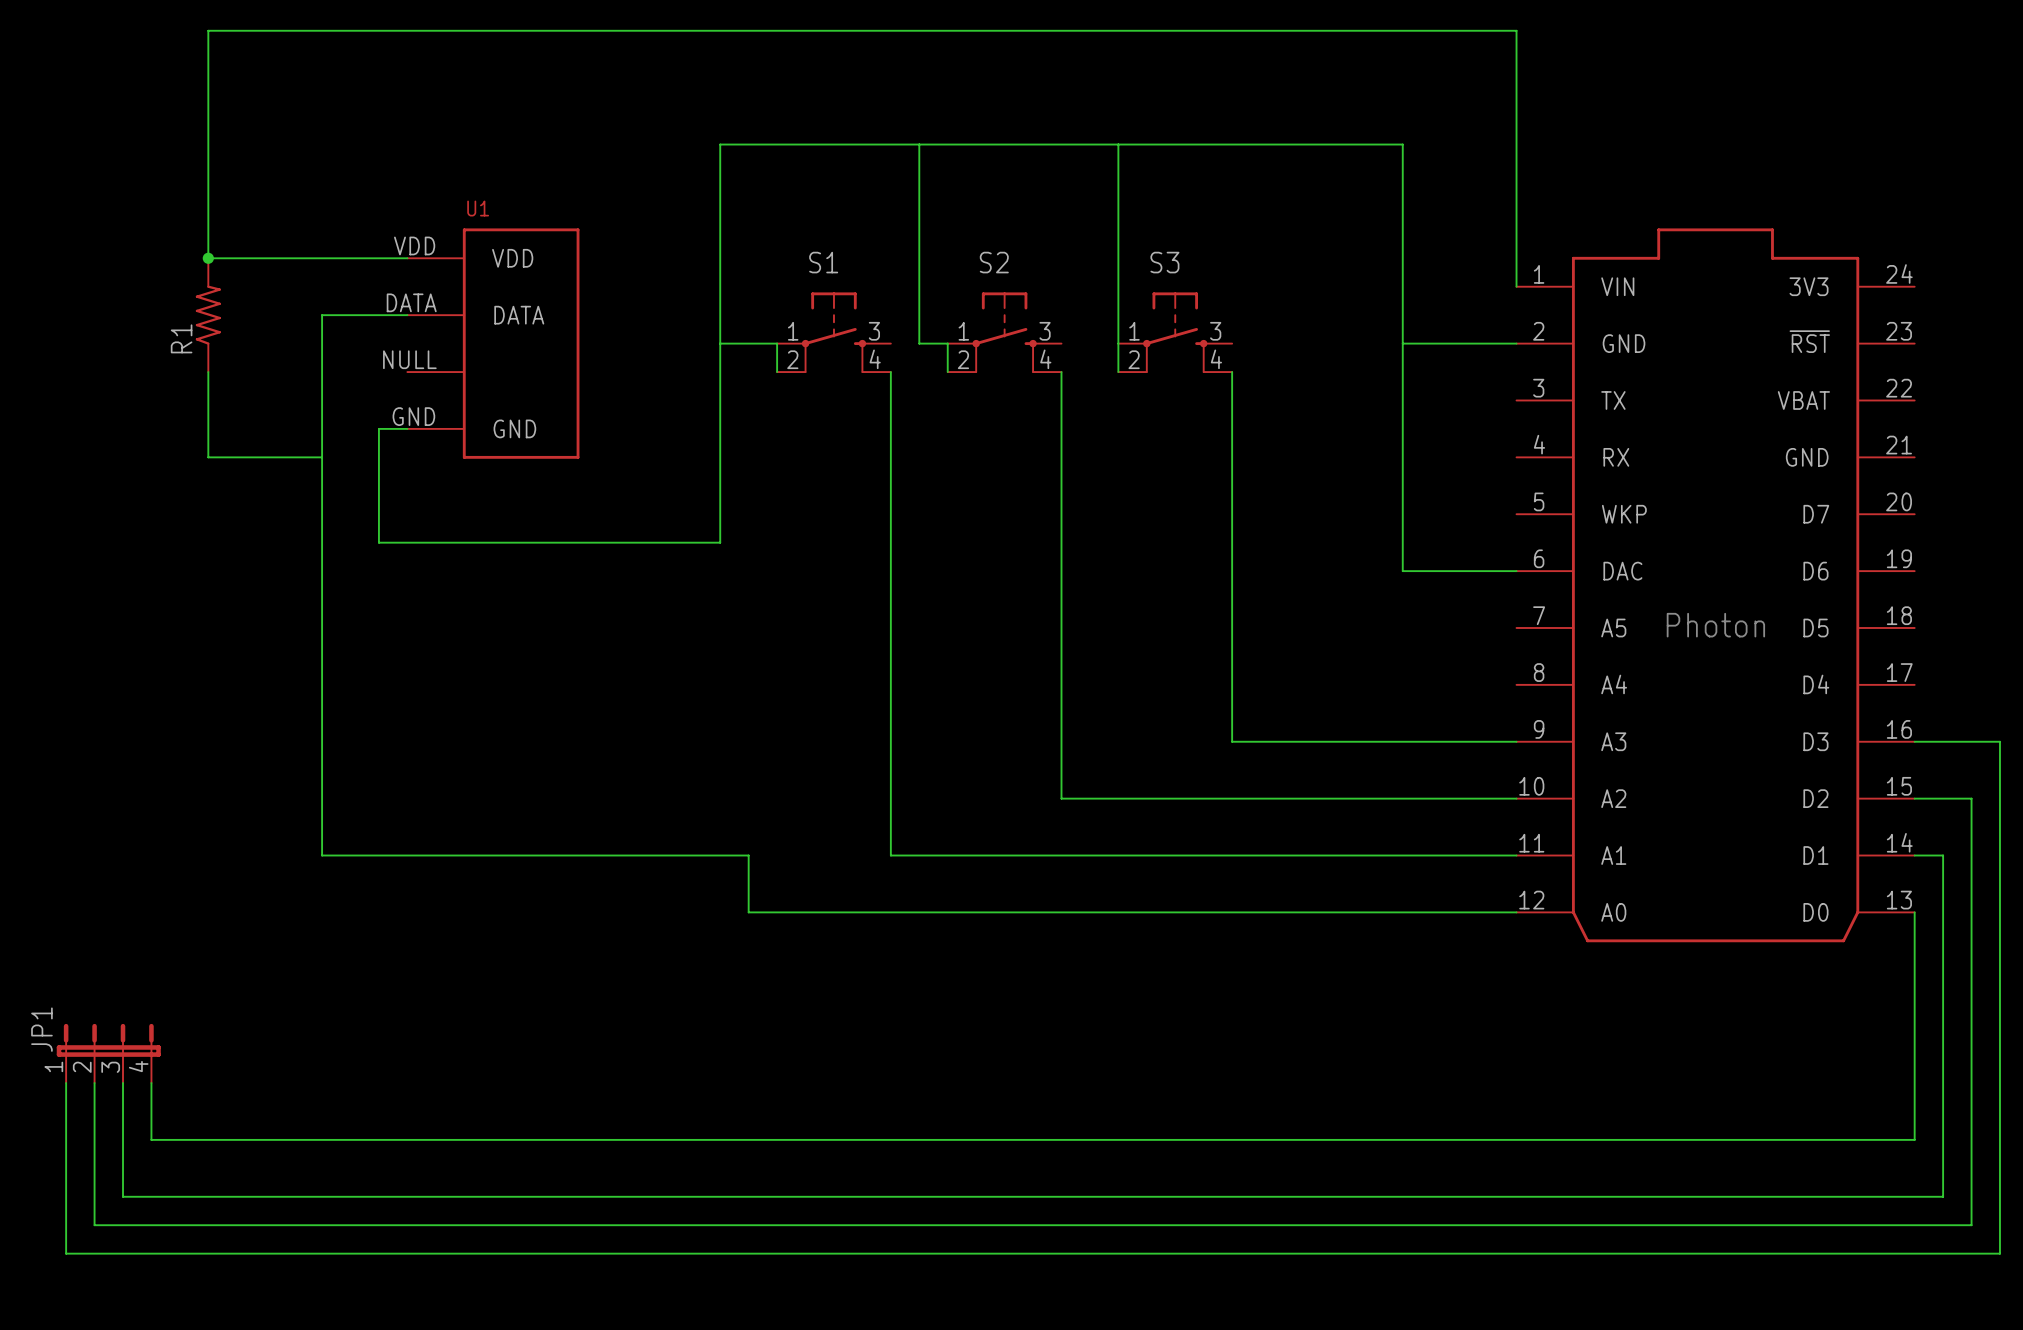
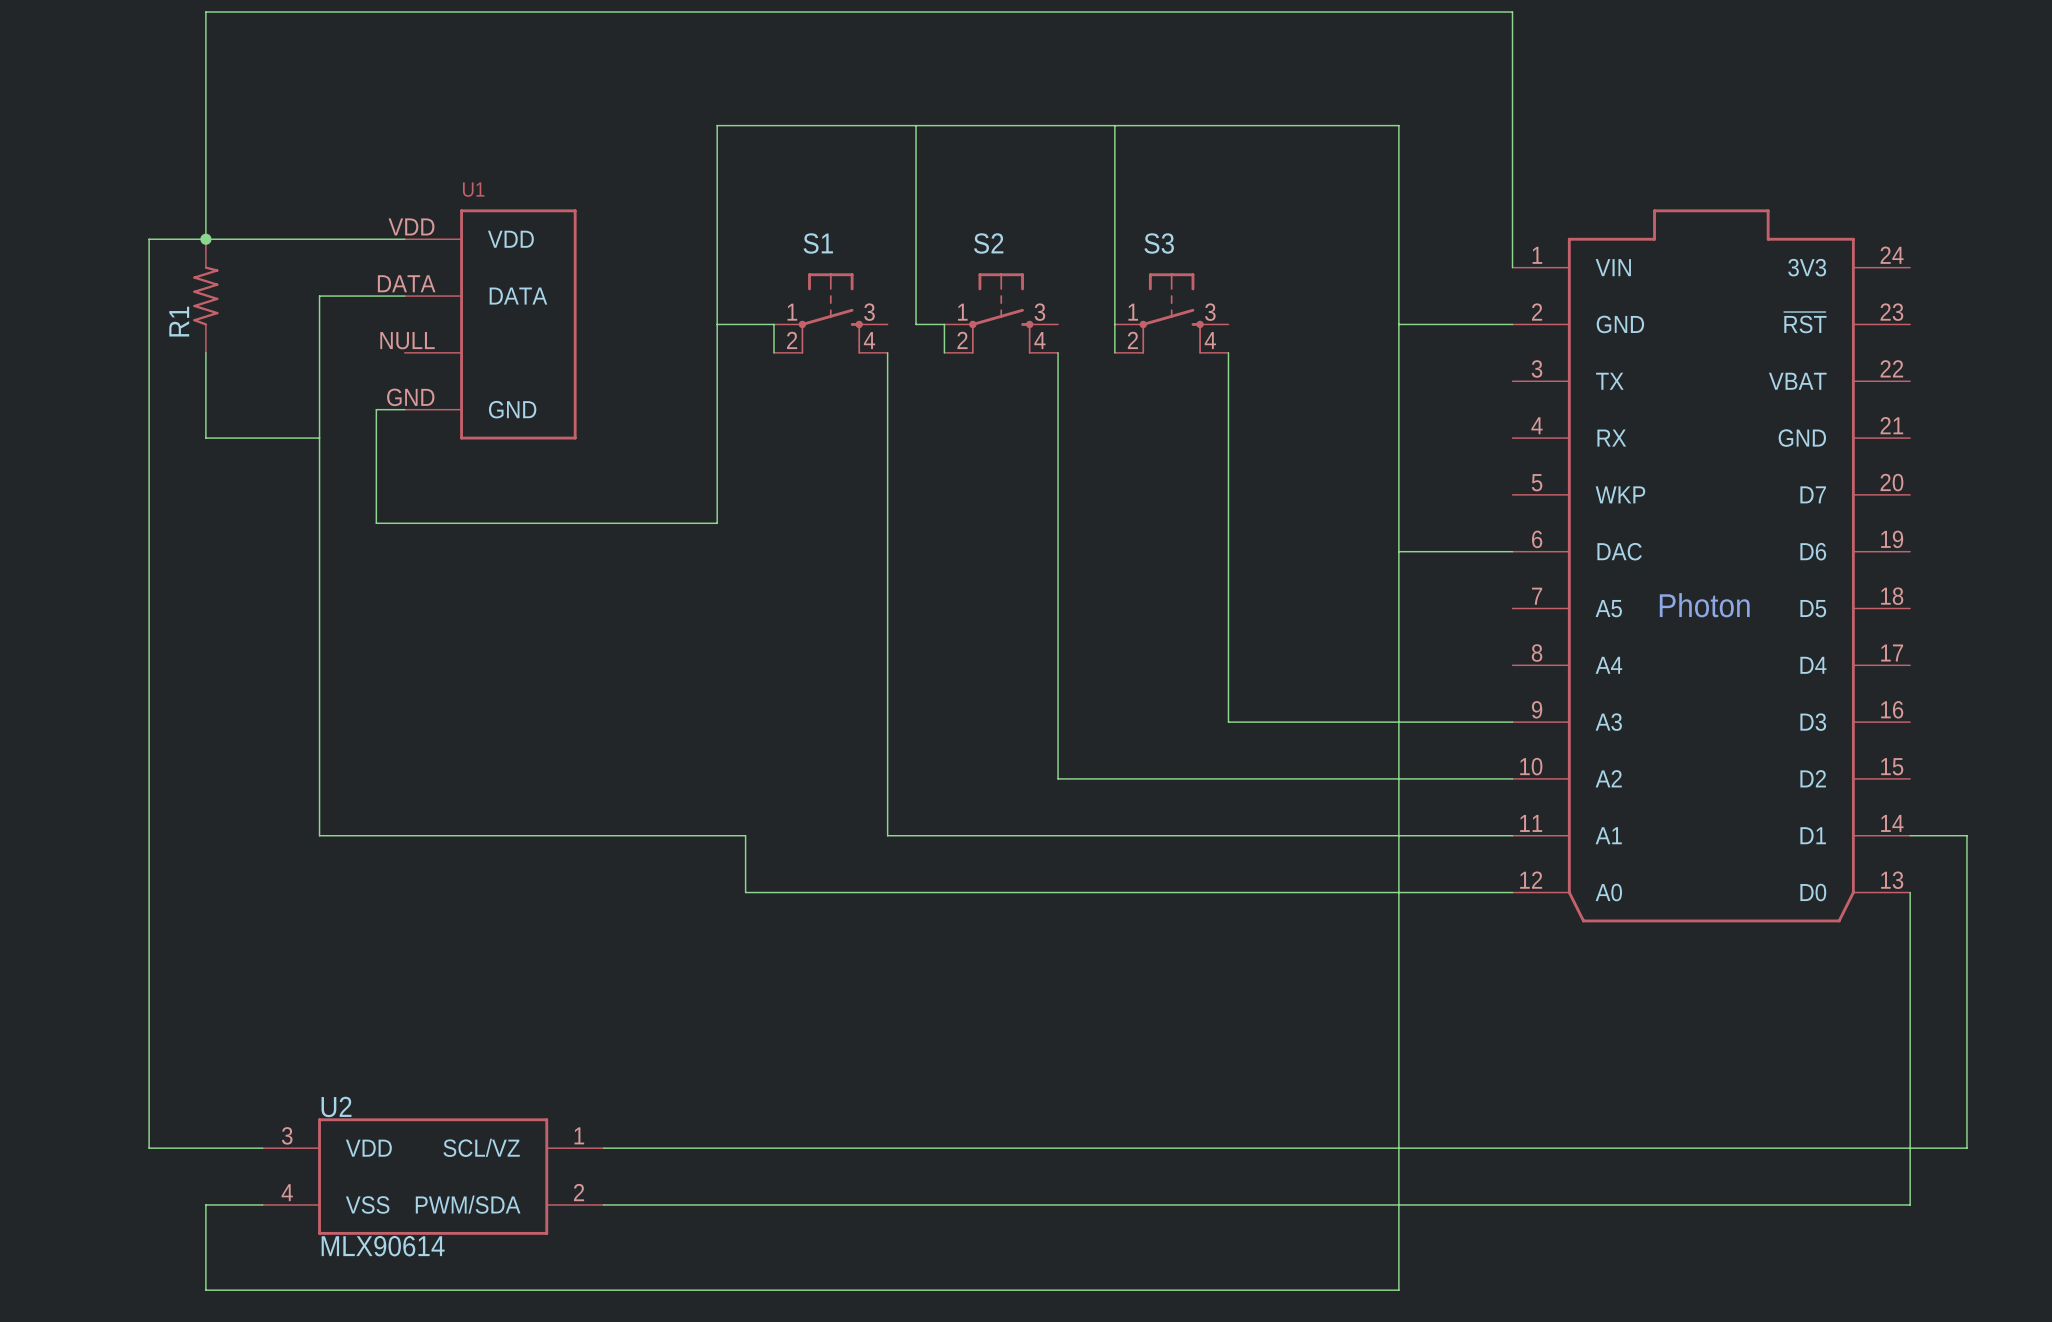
wire: none -> (205, 239) (149, 239) (149, 1062)
wire: (1914, 741) (1999, 741) (1999, 1253) (66, 1253) (66, 1083) -> none
wire: (1914, 798) (1971, 798) (1971, 855) -> (1938, 835) (1966, 835)
wire: (1943, 855) (1943, 1196) (123, 1196) (123, 1083) -> none
JP1: (108, 1053) -> none
wire: (94, 1083) (94, 1225) (208, 1225) -> (1398, 551) (1398, 1290) (205, 1290) (205, 1204)
wire: (151, 1139) (1914, 1139) -> (149, 1119) (149, 1148) (262, 1148)
wire: none -> (603, 1148) (1966, 1148)
wire: (1971, 1168) (1971, 1225) (1914, 1225) -> (1910, 1119) (1910, 1204)
U2: none -> MLX90614 (433, 1176)
wire: (265, 1225) (606, 1225) -> none

